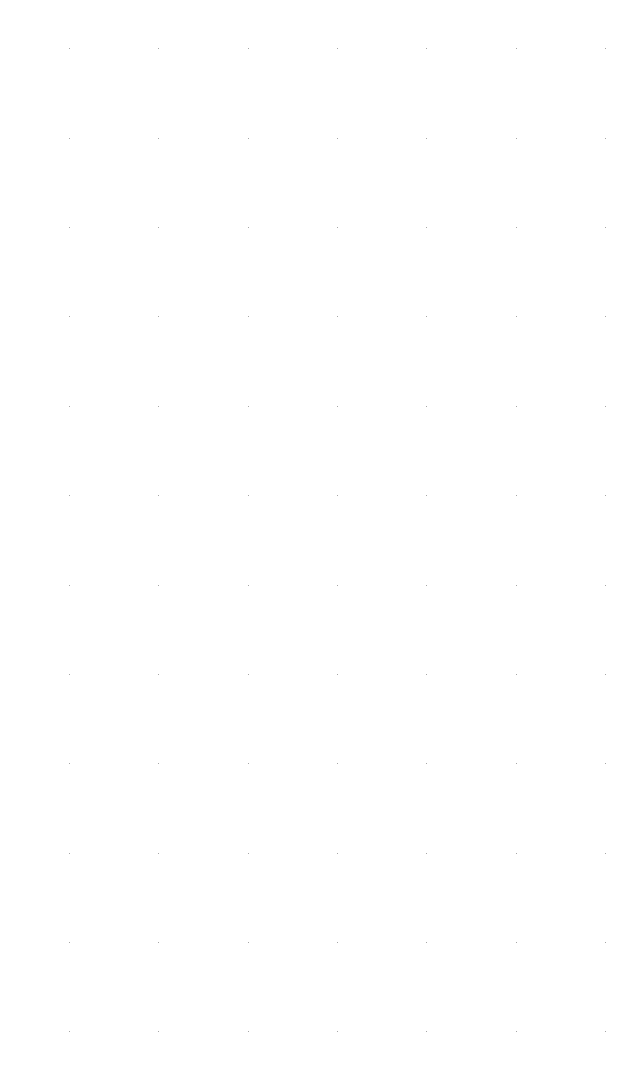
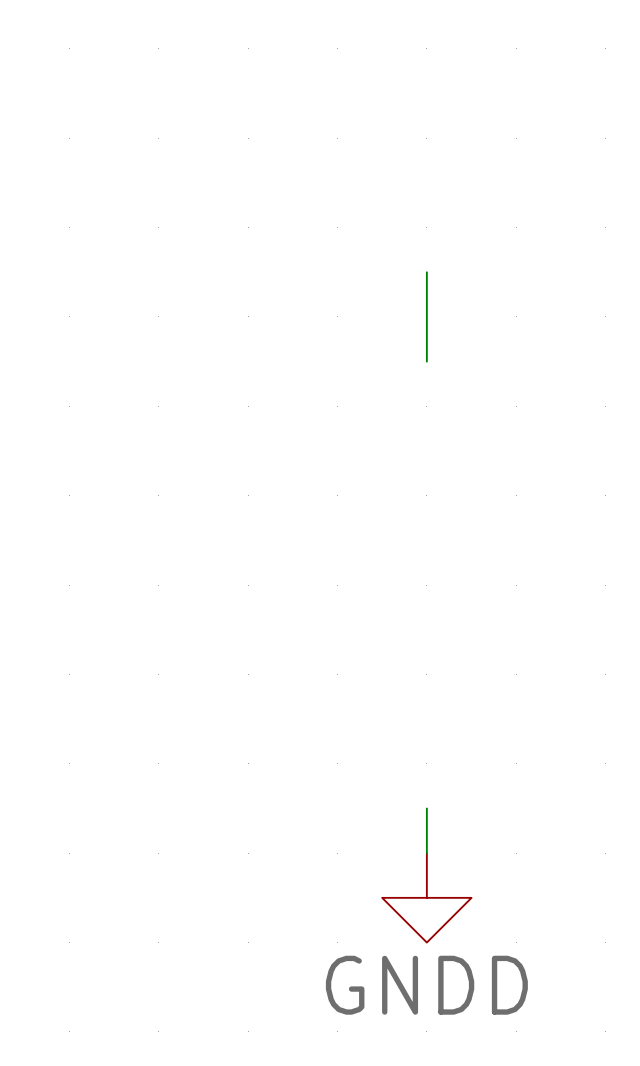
wire: none -> (426, 272) (426, 361)
wire: none -> (426, 808) (426, 853)
power symbol: none -> GNDD (426, 897)

